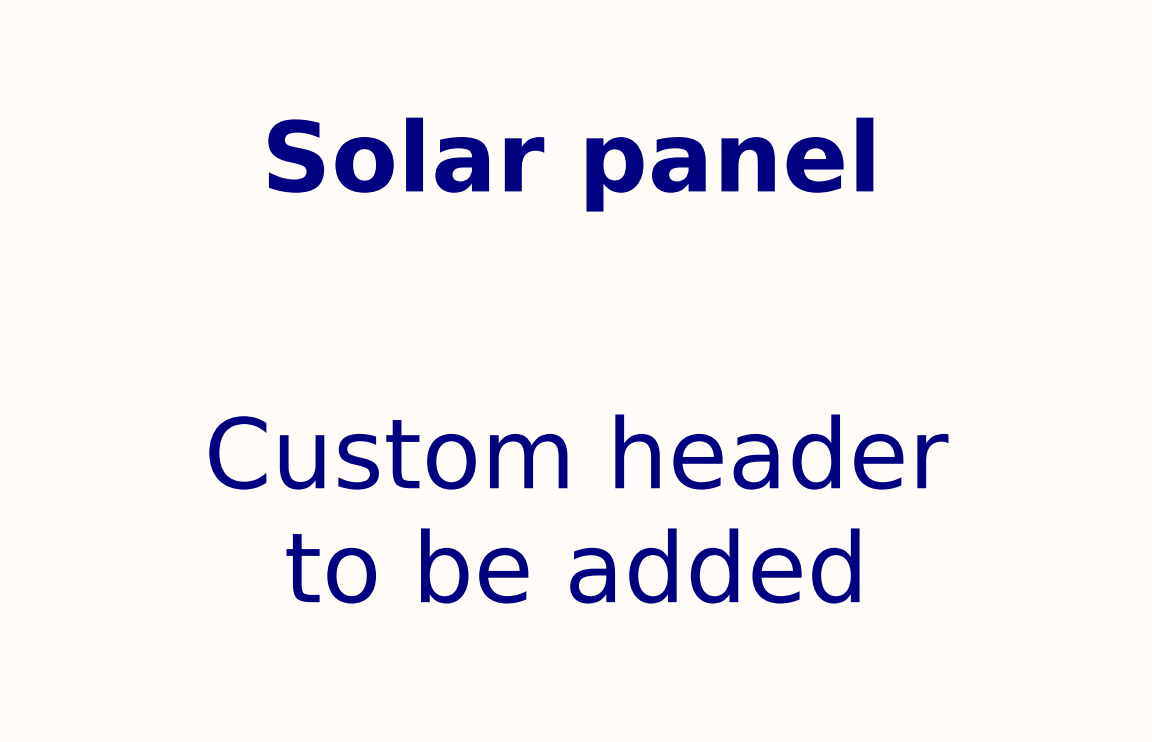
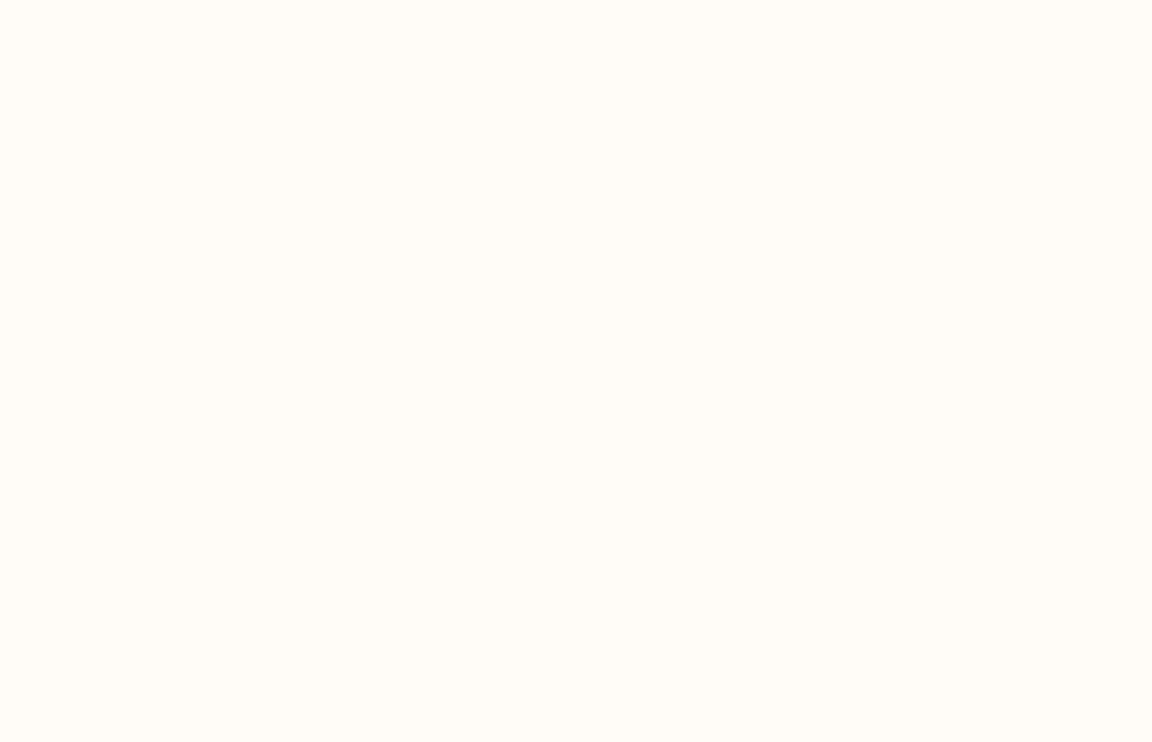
text: Solar panel (570, 164) -> none
text: Custom header (578, 452) -> none
text: to be added (573, 565) -> none

